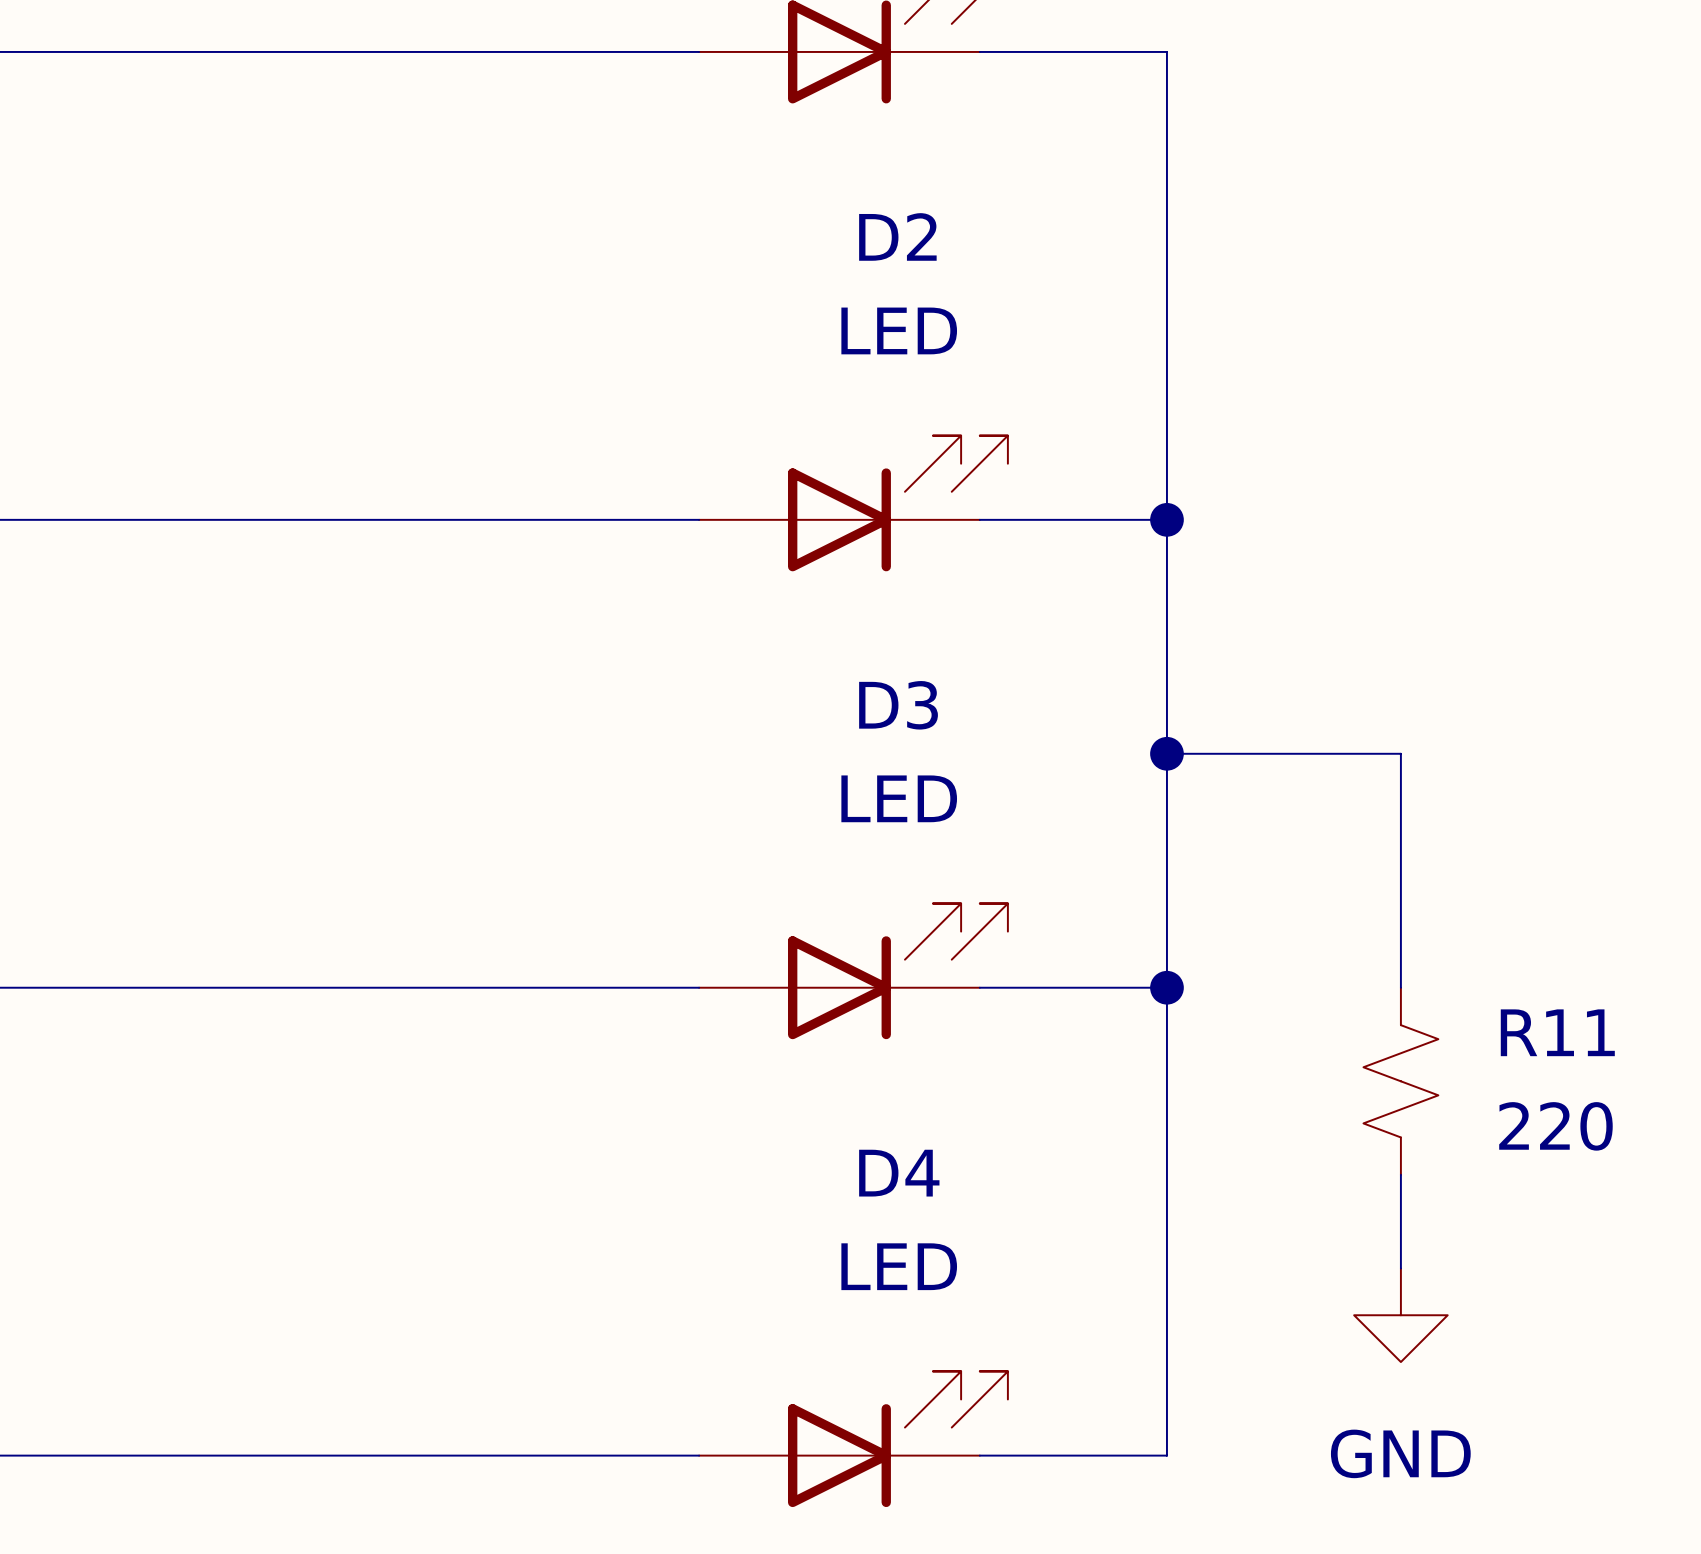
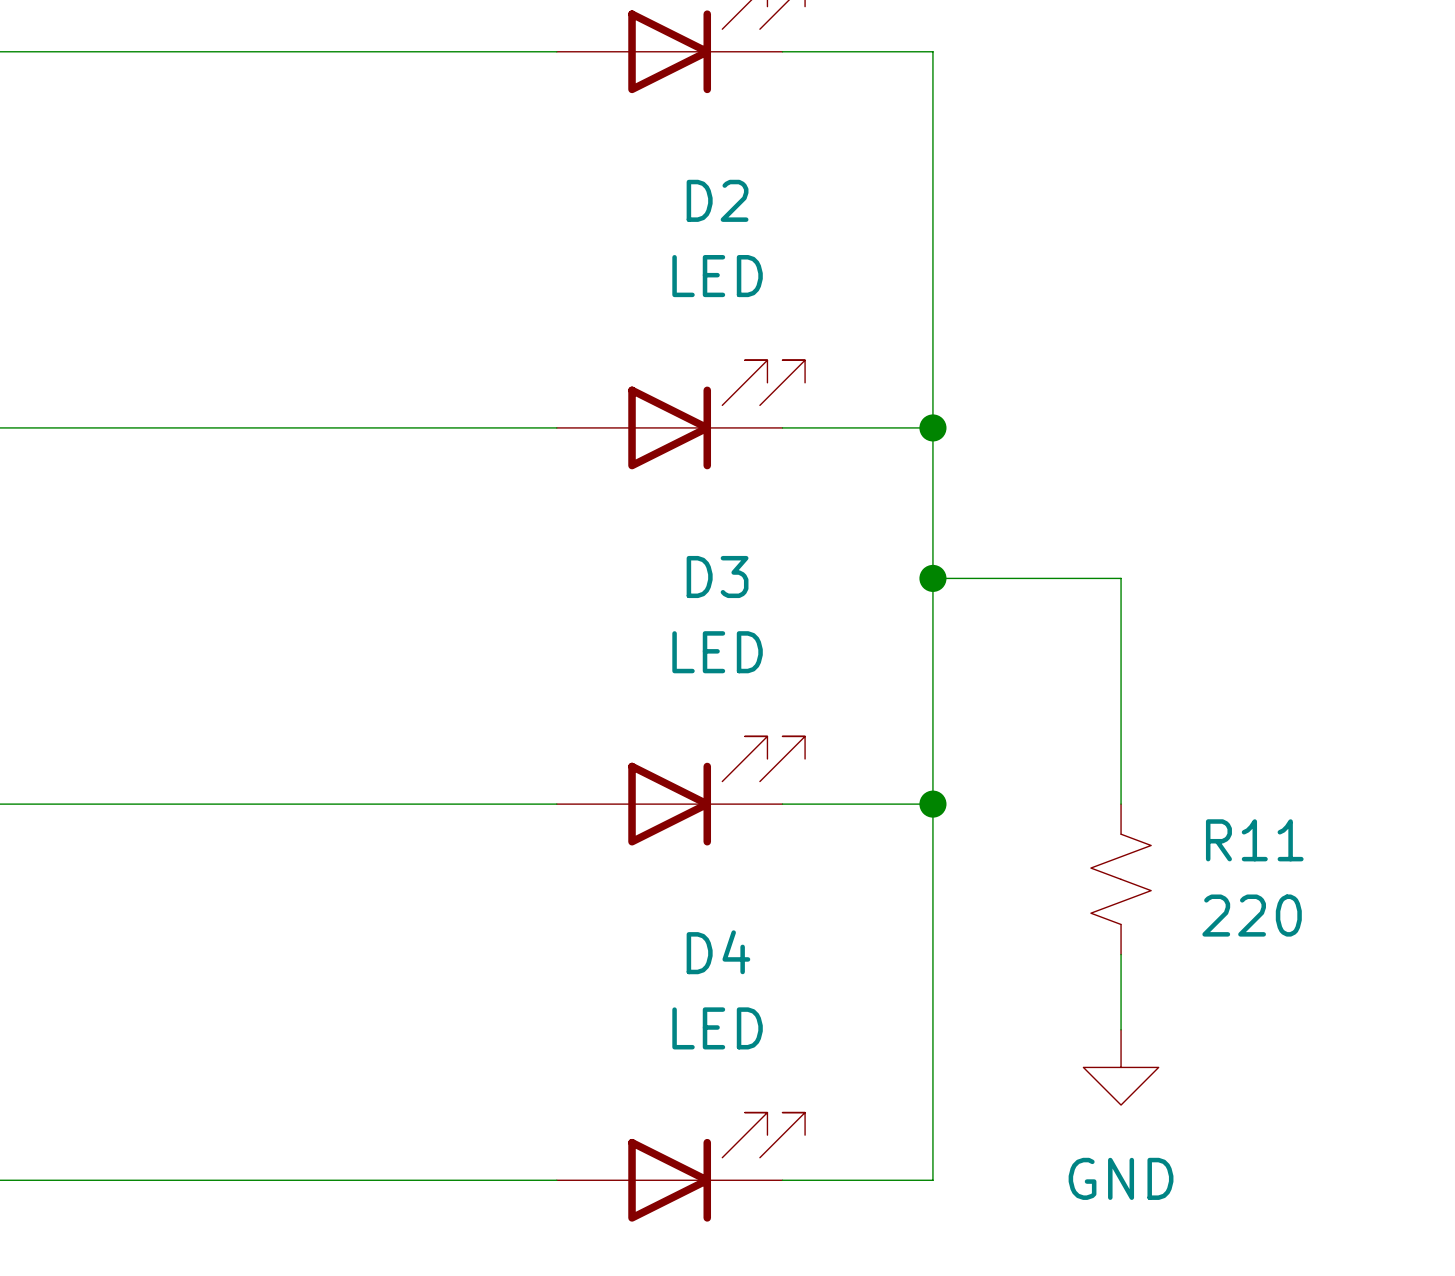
wire: (1166, 753) (1400, 753) -> (932, 578) (1121, 578) (1121, 616)
junction position: (1166, 753) -> (932, 578)

